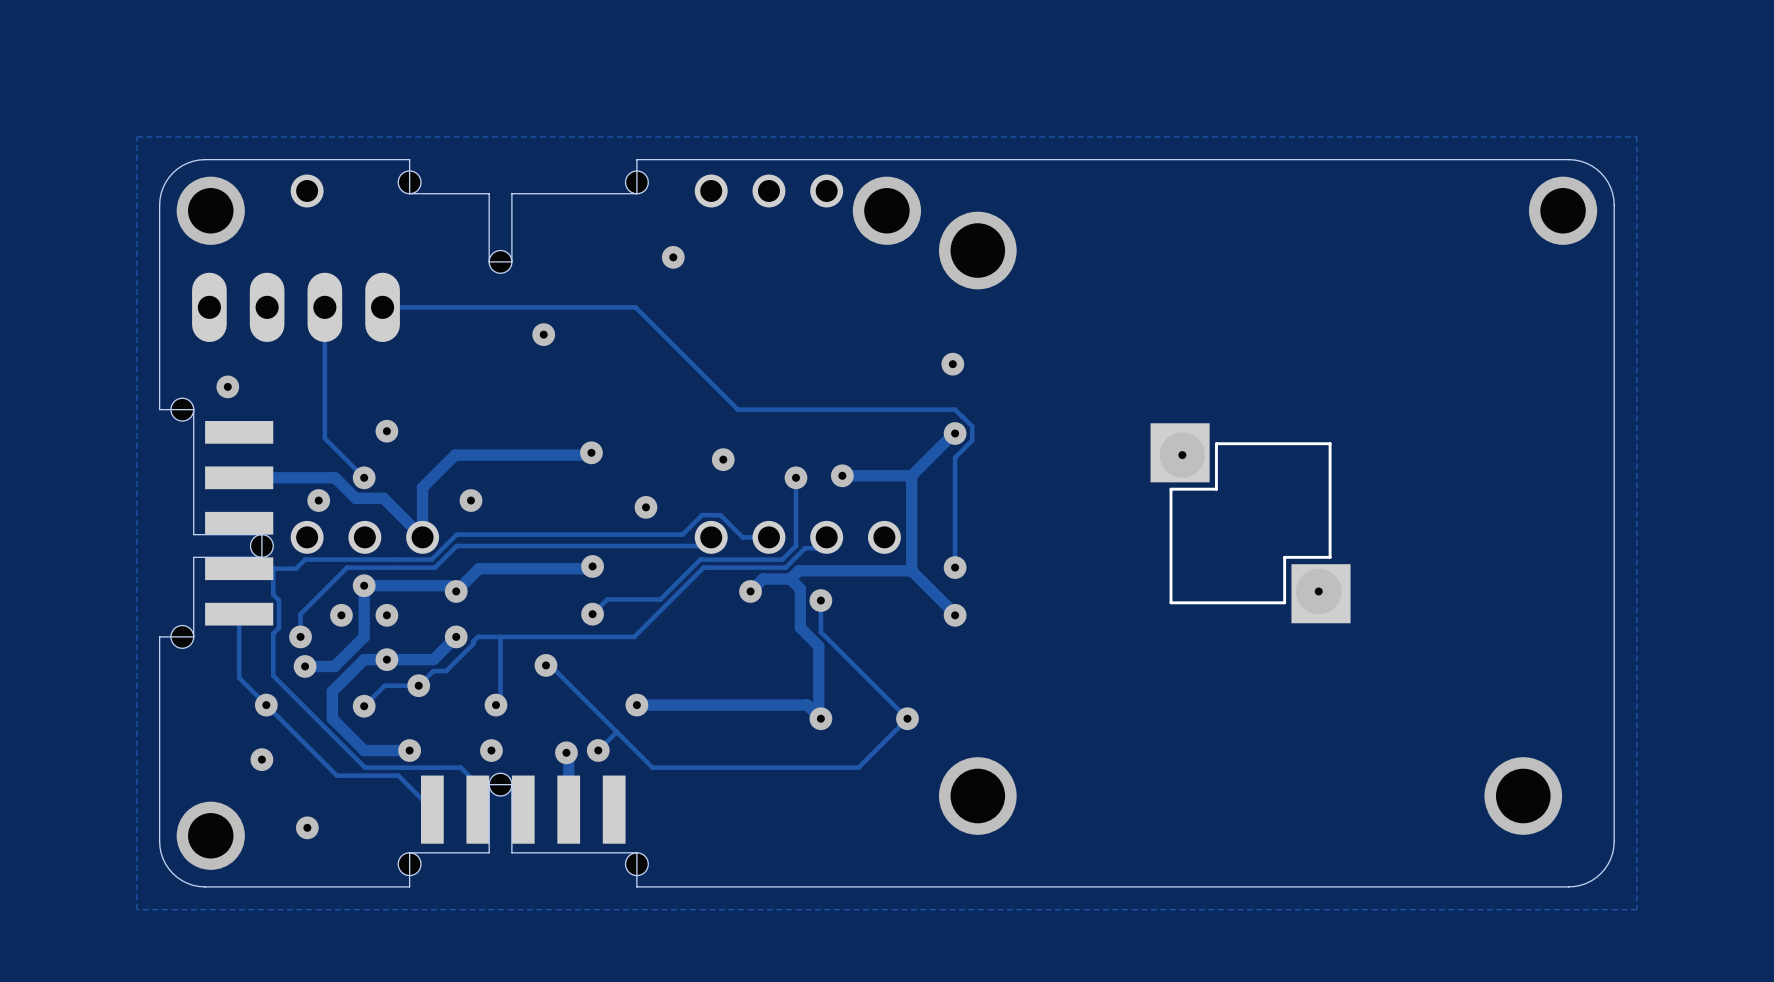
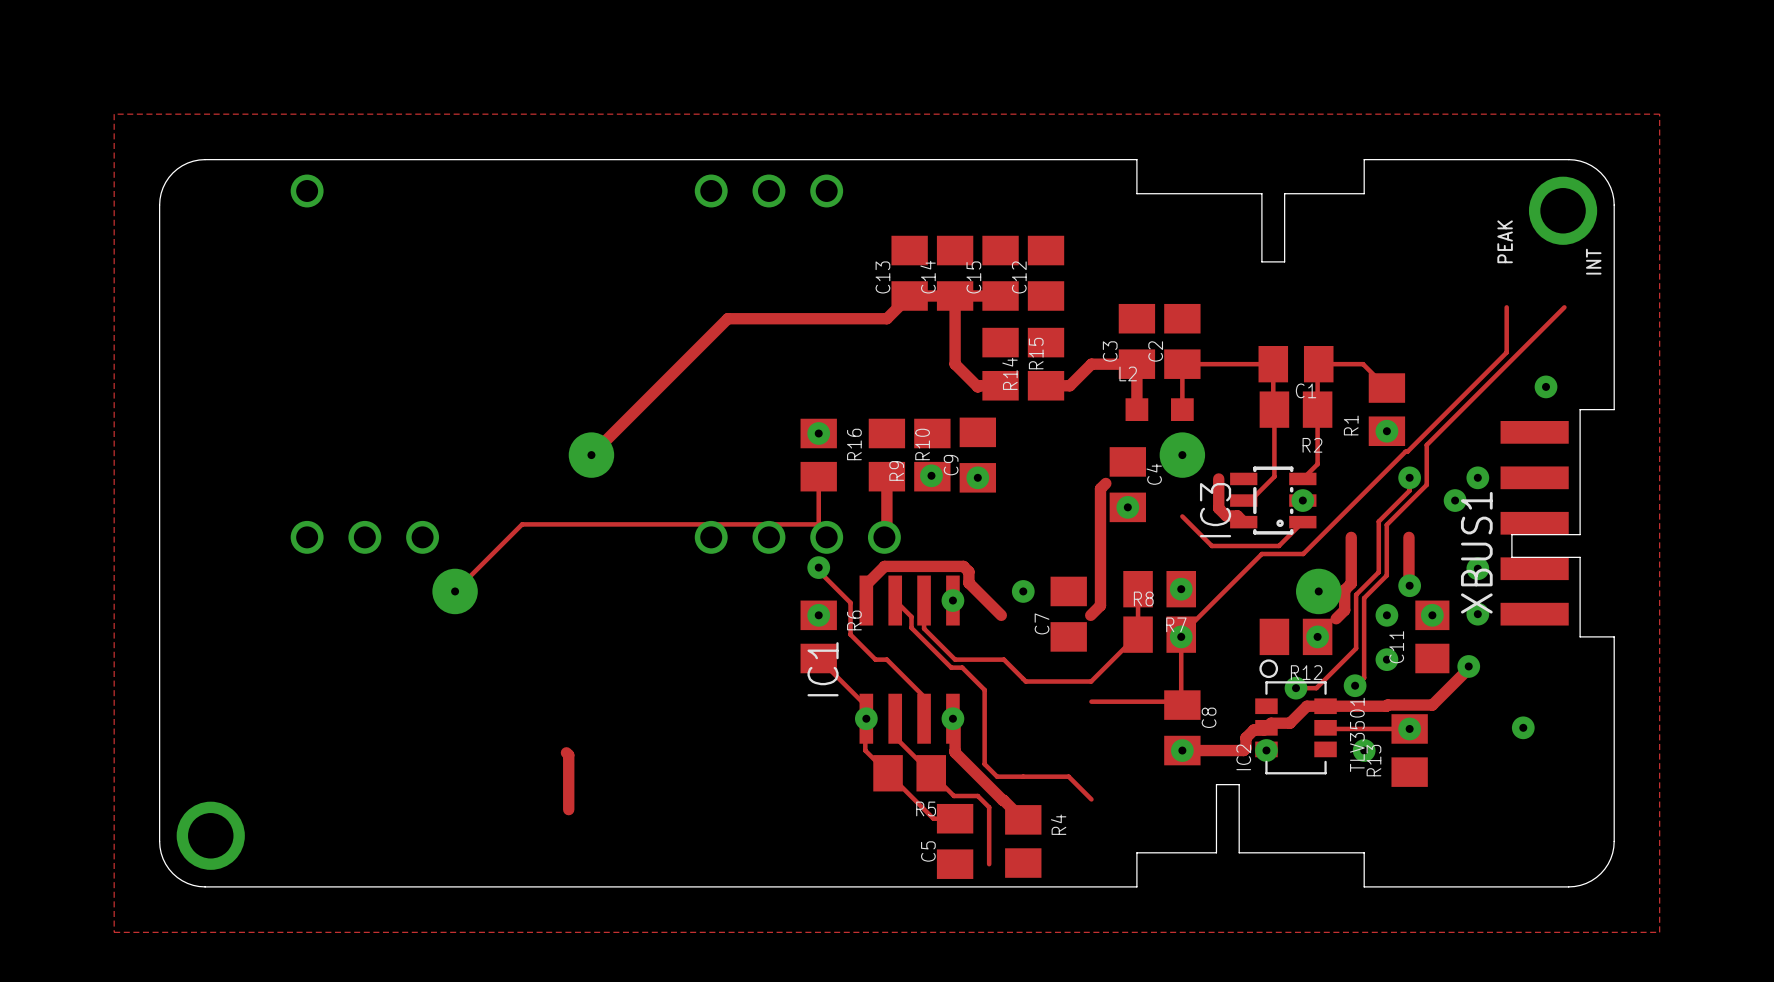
zone outline: (136, 136) (136, 909) (1636, 909) (1636, 136) (136, 136) -> (114, 114) (114, 932) (1659, 932) (1659, 114) (114, 114)
board edge: (409, 159) (409, 193) (489, 193) (489, 261) (511, 261) (511, 193) (636, 193) (636, 159) -> (409, 159) (636, 159)
board edge: (1136, 159) (1364, 159) -> (1136, 159) (1136, 193) (1261, 193) (1261, 261) (1284, 261) (1284, 193) (1364, 193) (1364, 159)
hole: (409, 182) -> none
hole: (636, 182) -> none
via: (210, 210) -> none
via: (886, 210) -> none
text: none -> PEAK (1505, 241)
via: (977, 250) -> none
via: (673, 257) -> none
hole: (500, 261) -> none
text: none -> INT (1593, 261)
C13: none -> (909, 273)
C14: none -> (955, 273)
C15: none -> (1000, 273)
C12: none -> (1046, 273)
track: none -> (955, 295) (955, 364) (977, 386) (1000, 385)
track: none -> (1000, 295) (909, 295) (886, 318) (727, 318) (591, 455)
part: (295, 307) -> none
track: (324, 307) (324, 438) (364, 477) -> none
track: (382, 307) (635, 307) (737, 409) (955, 409) (961, 416) -> none
track: none -> (1506, 307) (1506, 352) (1303, 554) (1261, 554) (1181, 634) (1181, 703)
track: none -> (1564, 307) (1426, 445) (1426, 484) (1386, 524) (1386, 575) (1364, 598) (1364, 677) (1352, 689)
via: (543, 334) -> none
C3: none -> (1136, 341)
C2: none -> (1182, 341)
via: (952, 364) -> none
R15: none -> (1000, 364)
R14: none -> (1046, 364)
C1: none -> (1296, 364)
track: none -> (1046, 385) (1069, 385) (1091, 364) (1136, 364) (1136, 409)
via: (227, 386) -> none
via: none -> (1546, 386)
track: none -> (1386, 388) (1363, 364) (1317, 365) (1317, 464) (1302, 478)
board edge: (159, 409) (193, 409) (193, 534) (261, 534) (261, 557) (193, 557) (193, 636) (159, 636) -> (159, 409) (159, 636)
hole: (182, 409) -> none
L2: none -> (1159, 409)
track: none -> (1182, 409) (1182, 364) (1273, 364) (1274, 476) (1250, 500) (1243, 500)
R2: none -> (1296, 409)
R1: none -> (1386, 409)
board edge: (1614, 409) (1614, 636) -> (1614, 409) (1580, 409) (1580, 534) (1511, 534) (1511, 557) (1580, 557) (1580, 636) (1614, 636)
track: (962, 416) (972, 426) (972, 440) (955, 457) (955, 568) -> none
via: (386, 431) -> none
via: none -> (1386, 431)
via: none -> (818, 433)
track: (955, 433) (911, 475) -> none
via: (955, 433) -> none
via size: [580, 441, 603, 465] -> [568, 432, 615, 478]
track: (591, 452) (591, 455) (455, 455) (422, 487) (422, 537) (383, 498) (355, 498) (335, 477) (239, 477) -> none
R16: none -> (818, 455)
R10: none -> (886, 455)
R9: none -> (932, 455)
C9: none -> (977, 455)
via: (723, 459) -> none
track: (842, 475) (911, 475) -> none
via: (842, 475) -> none
track: (911, 475) (911, 570) -> none
via: none -> (931, 475)
track: none -> (818, 476) (818, 524) (522, 524) (455, 591)
track: none -> (886, 476) (886, 534) (889, 537)
via: (364, 477) -> none
track: (796, 477) (796, 546) (782, 559) (700, 559) (660, 599) (607, 599) (591, 614) -> none
via: (796, 477) -> none
via: none -> (977, 477)
track: none -> (1409, 477) (1409, 490) (1378, 521) (1378, 572) (1356, 594) (1356, 648) (1316, 688) (1296, 688)
via: none -> (1409, 477)
via: none -> (1477, 477)
track: none -> (1218, 478) (1218, 508) (1226, 515) (1237, 515) (1243, 522)
track: none -> (1105, 483) (1100, 488) (1100, 605) (1090, 615)
C4: none -> (1127, 484)
via: (318, 500) -> none
via: (470, 500) -> none
IC3: none -> (1273, 500)
via: none -> (1302, 500)
via: none -> (1455, 500)
via: (646, 507) -> none
via: none -> (1127, 507)
track: none -> (1182, 516) (1211, 546) (1278, 546) (1302, 522)
part: (239, 523) -> none
part: (1250, 523) -> none
XBUS1: none -> (1534, 523)
track: (711, 537) (702, 546) (456, 546) (435, 567) (347, 567) (300, 614) (300, 636) -> none
track: (768, 537) (742, 537) (720, 515) (702, 515) (682, 534) (456, 534) (431, 559) (305, 559) (295, 568) (239, 568) -> none
track: (826, 537) (815, 548) (805, 548) (785, 567) (703, 567) (634, 636) (477, 636) (473, 643) (446, 671) (433, 671) (418, 685) (384, 685) (364, 706) -> none
track: none -> (1351, 537) (1351, 583) (1344, 590) (1344, 610) (1336, 618)
track: none -> (1408, 537) (1409, 585)
hole: (261, 546) -> none
track: (592, 566) (590, 568) (478, 568) (456, 591) (449, 585) (364, 585) (364, 636) (334, 666) (305, 666) -> none
via: (592, 566) -> none
track: none -> (818, 567) (818, 571) (850, 602) (850, 634) (875, 659) (886, 659) (924, 696) (924, 718)
via: none -> (818, 567)
via: (955, 567) -> none
track: (273, 568) (273, 594) (279, 600) (279, 627) (273, 633) (273, 675) (365, 767) (460, 767) (477, 784) (477, 809) -> none
via: none -> (1477, 568)
track: (911, 570) (955, 615) -> none
track: (911, 570) (798, 570) (790, 579) -> none
track: (790, 579) (762, 579) (750, 591) -> none
track: (790, 579) (800, 589) (800, 627) (818, 646) (818, 720) (820, 718) (807, 705) (636, 705) -> none
via size: [444, 580, 468, 603] -> [432, 568, 478, 615]
via: (364, 585) -> none
via: none -> (1409, 585)
track: none -> (1138, 589) (1138, 634) (1091, 681) (1025, 681) (1003, 659) (955, 659) (924, 628) (924, 600)
R7: none -> (1159, 589)
via: none -> (1181, 589)
via: (750, 591) -> none
via: none -> (1023, 591)
track: (820, 600) (820, 632) (907, 718) (858, 767) (652, 767) (550, 665) (546, 665) -> none
via position: (820, 600) -> (818, 615)
track: none -> (866, 600) (866, 584) (884, 566) (963, 566) (968, 571) (968, 582) (1001, 615)
track: none -> (895, 600) (911, 616) (911, 627) (951, 667) (962, 667) (984, 689) (984, 764) (997, 776) (1068, 776) (1091, 799)
track: (239, 614) (239, 677) (336, 775) (398, 775) (432, 809) -> none
via: (592, 614) -> none
C7: none -> (1068, 614)
via: none -> (1477, 614)
via: (341, 615) -> none
via: (386, 615) -> none
via position: (955, 615) -> (952, 600)
via: none -> (1386, 615)
via: none -> (1432, 615)
R8: none -> (1159, 634)
hole: (182, 636) -> none
via: (300, 636) -> none
track: (456, 636) (433, 659) (364, 659) (332, 691) (332, 718) (364, 750) (409, 750) -> none
via: (456, 636) -> none
track: (500, 636) (500, 700) (495, 705) -> none
R6: none -> (818, 636)
via: none -> (1181, 636)
R12: none -> (1296, 636)
via: none -> (1317, 636)
C11: none -> (1432, 636)
track: none -> (818, 658) (865, 705) (865, 750) (933, 818) (955, 818)
via: (386, 659) -> none
IC1: none -> (909, 659)
via: none -> (1386, 659)
via: (546, 665) -> none
via: (305, 666) -> none
track: none -> (1468, 666) (1468, 668) (1432, 705) (1306, 706) (1289, 723) (1271, 723) (1264, 729) (1253, 729) (1245, 737) (1245, 748) (1243, 750) (1182, 750)
via: none -> (1468, 666)
via: (418, 685) -> none
via: none -> (1355, 685)
via: none -> (1296, 688)
track: none -> (1091, 701) (1178, 701) (1182, 705)
via: (266, 705) -> none
via: (495, 705) -> none
via: (636, 705) -> none
via: (364, 706) -> none
IC2: none -> TLV3501 (1296, 716)
via: (820, 718) -> none
via: none -> (866, 718)
track: none -> (895, 718) (895, 737) (953, 796) (977, 796) (989, 807) (989, 864)
via: (907, 718) -> none
track: none -> (952, 718) (955, 720) (955, 752) (1023, 819)
via: none -> (952, 718)
C8: none -> (1182, 727)
track: none -> (1325, 727) (1409, 728)
via: none -> (1523, 727)
via: none -> (1409, 728)
track: (616, 731) (598, 750) -> none
via: (409, 750) -> none
via: (491, 750) -> none
via: (598, 750) -> none
via: none -> (1182, 750)
via: none -> (1266, 750)
via: none -> (1364, 750)
R13: none -> (1409, 750)
via: (566, 752) -> none
via: (261, 759) -> none
R5: none -> (909, 773)
hole: (500, 784) -> none
via: (977, 796) -> none
via: (1523, 796) -> none
part: (523, 809) -> none
via: (307, 827) -> none
C5: none -> (955, 841)
R4: none -> (1023, 841)
hole: (409, 864) -> none
hole: (636, 864) -> none
board edge: (409, 886) (409, 852) (489, 852) (489, 784) (511, 784) (511, 852) (636, 852) (636, 886) -> (409, 886) (636, 886)
board edge: (1136, 886) (1364, 886) -> (1136, 886) (1136, 852) (1216, 852) (1216, 784) (1239, 784) (1239, 852) (1364, 852) (1364, 886)

